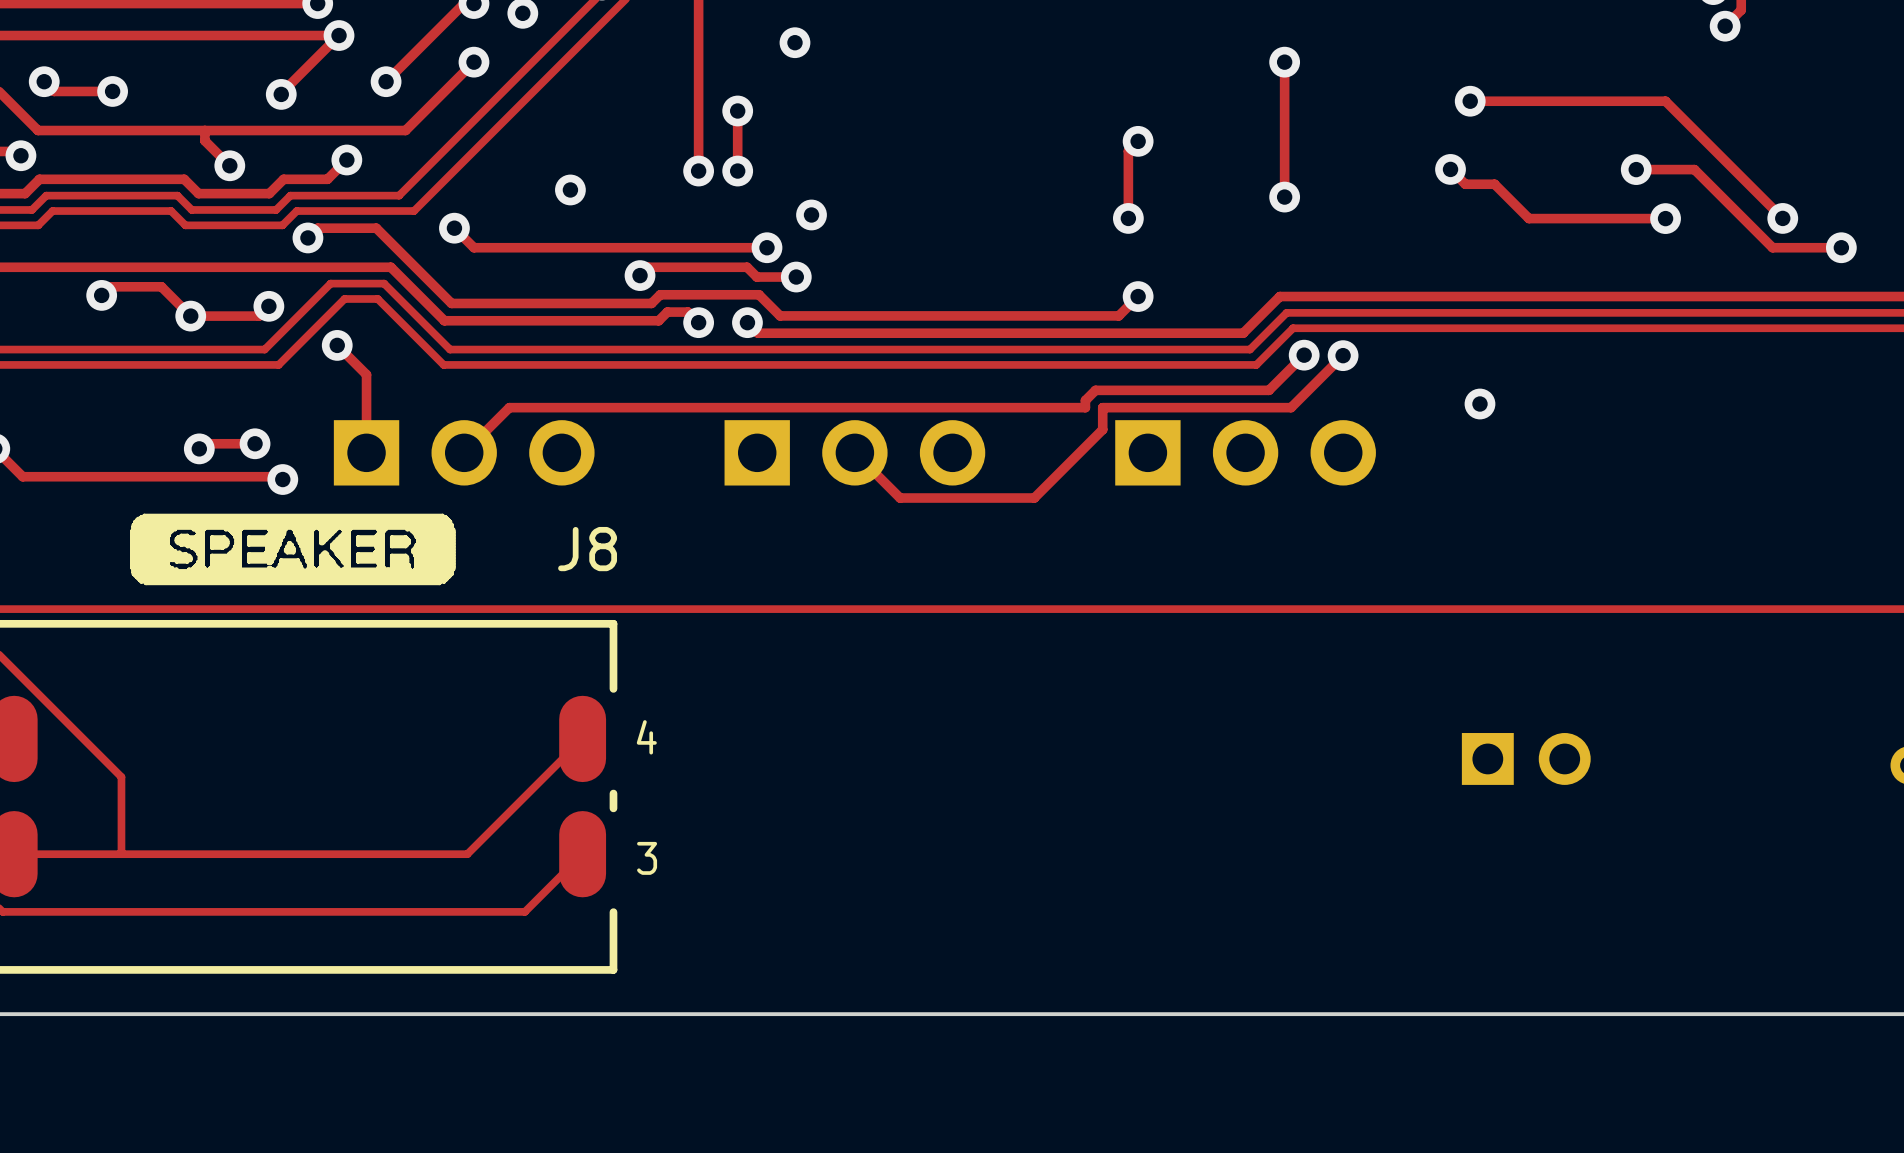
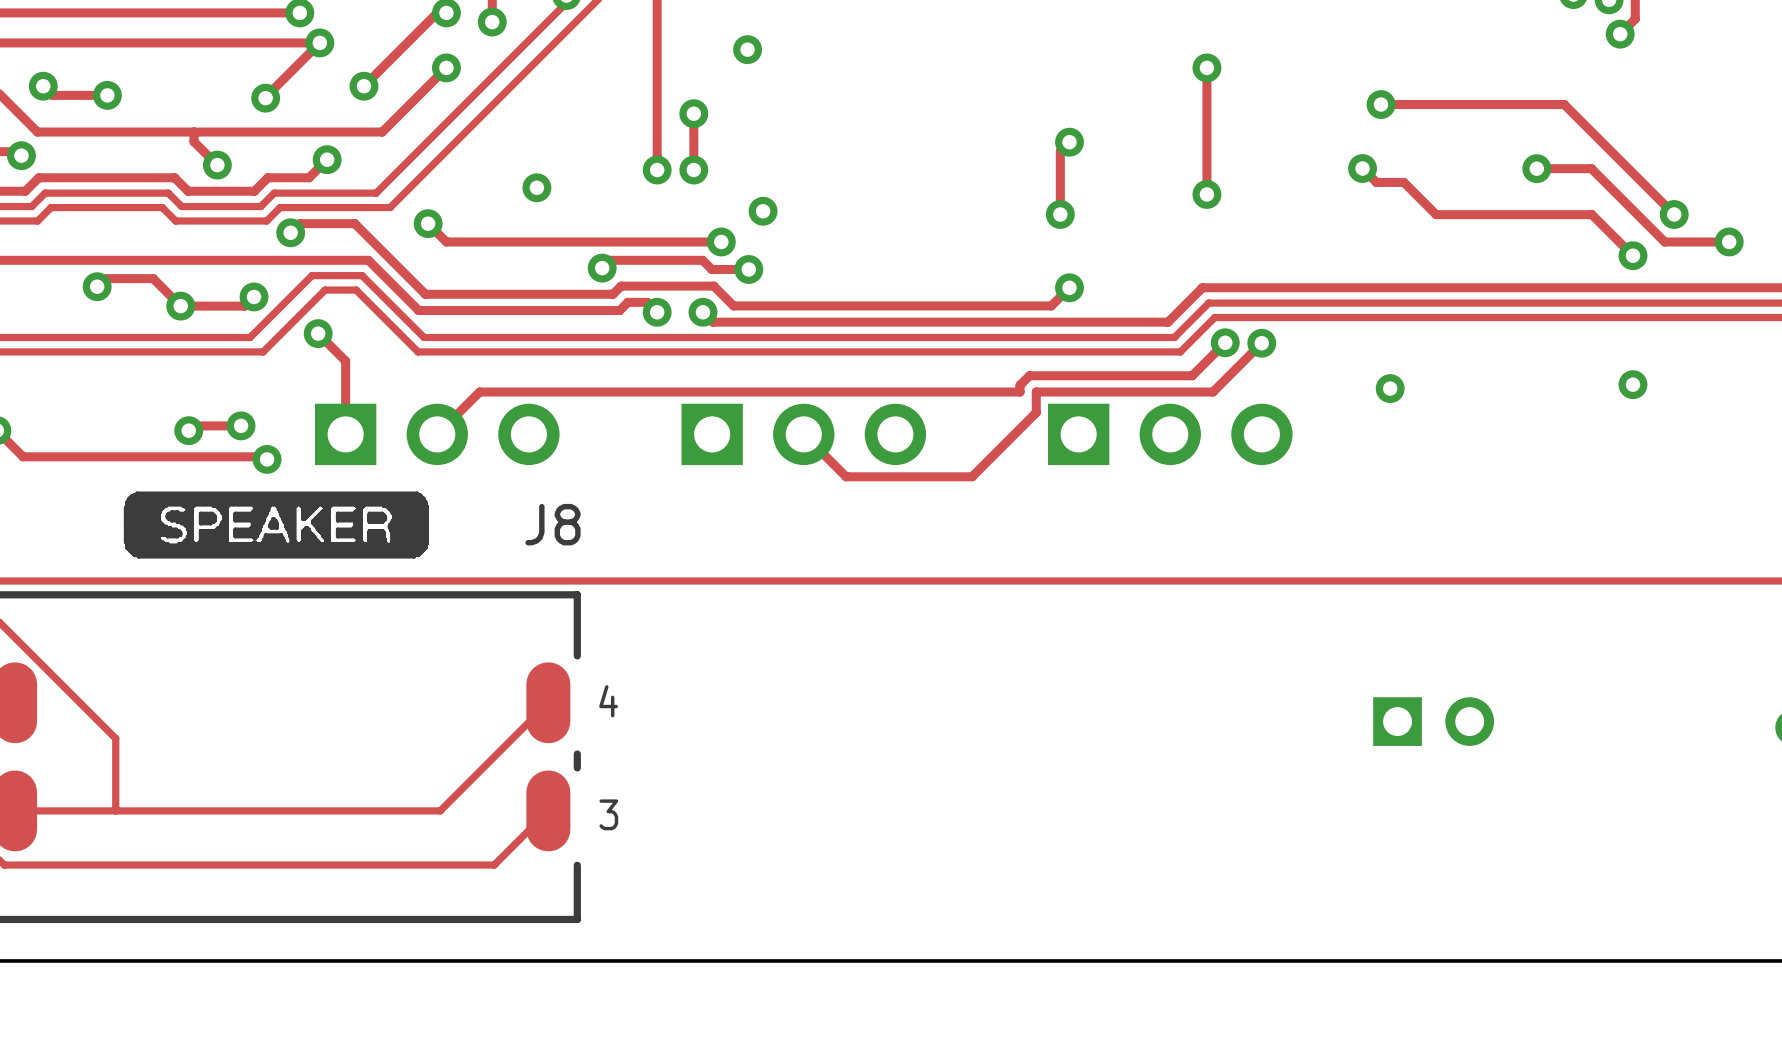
track: none -> (1564, 214) (1591, 214) (1633, 255)
via position: (1665, 218) -> (1633, 255)
via: none -> (1633, 384)

